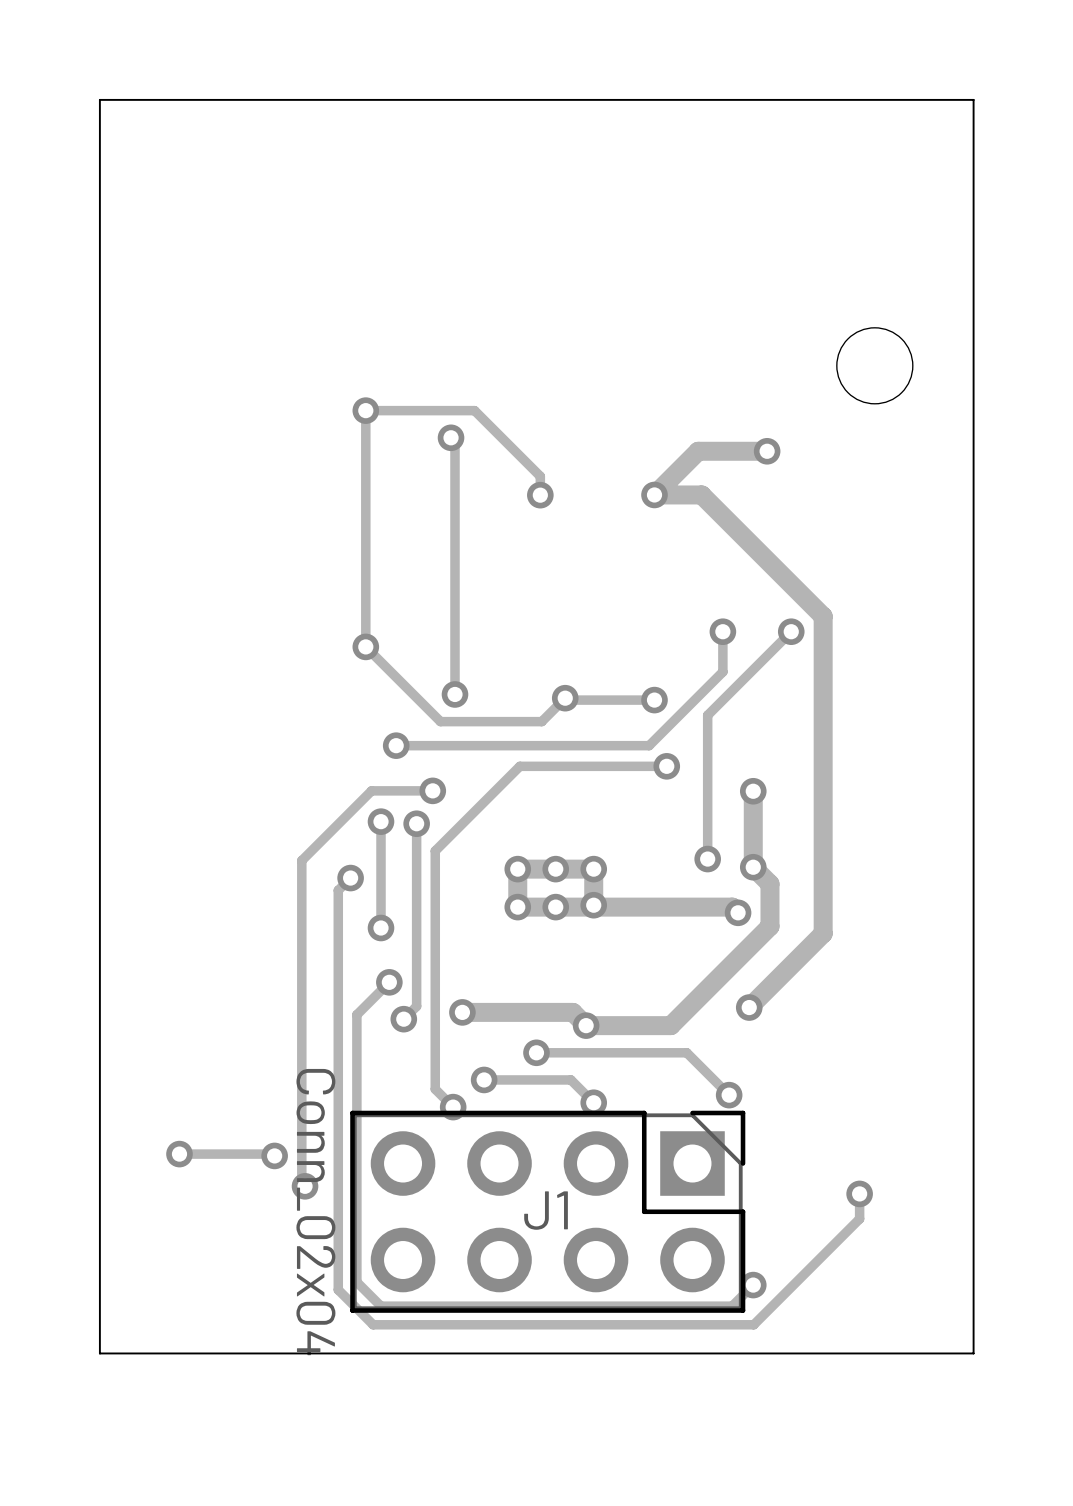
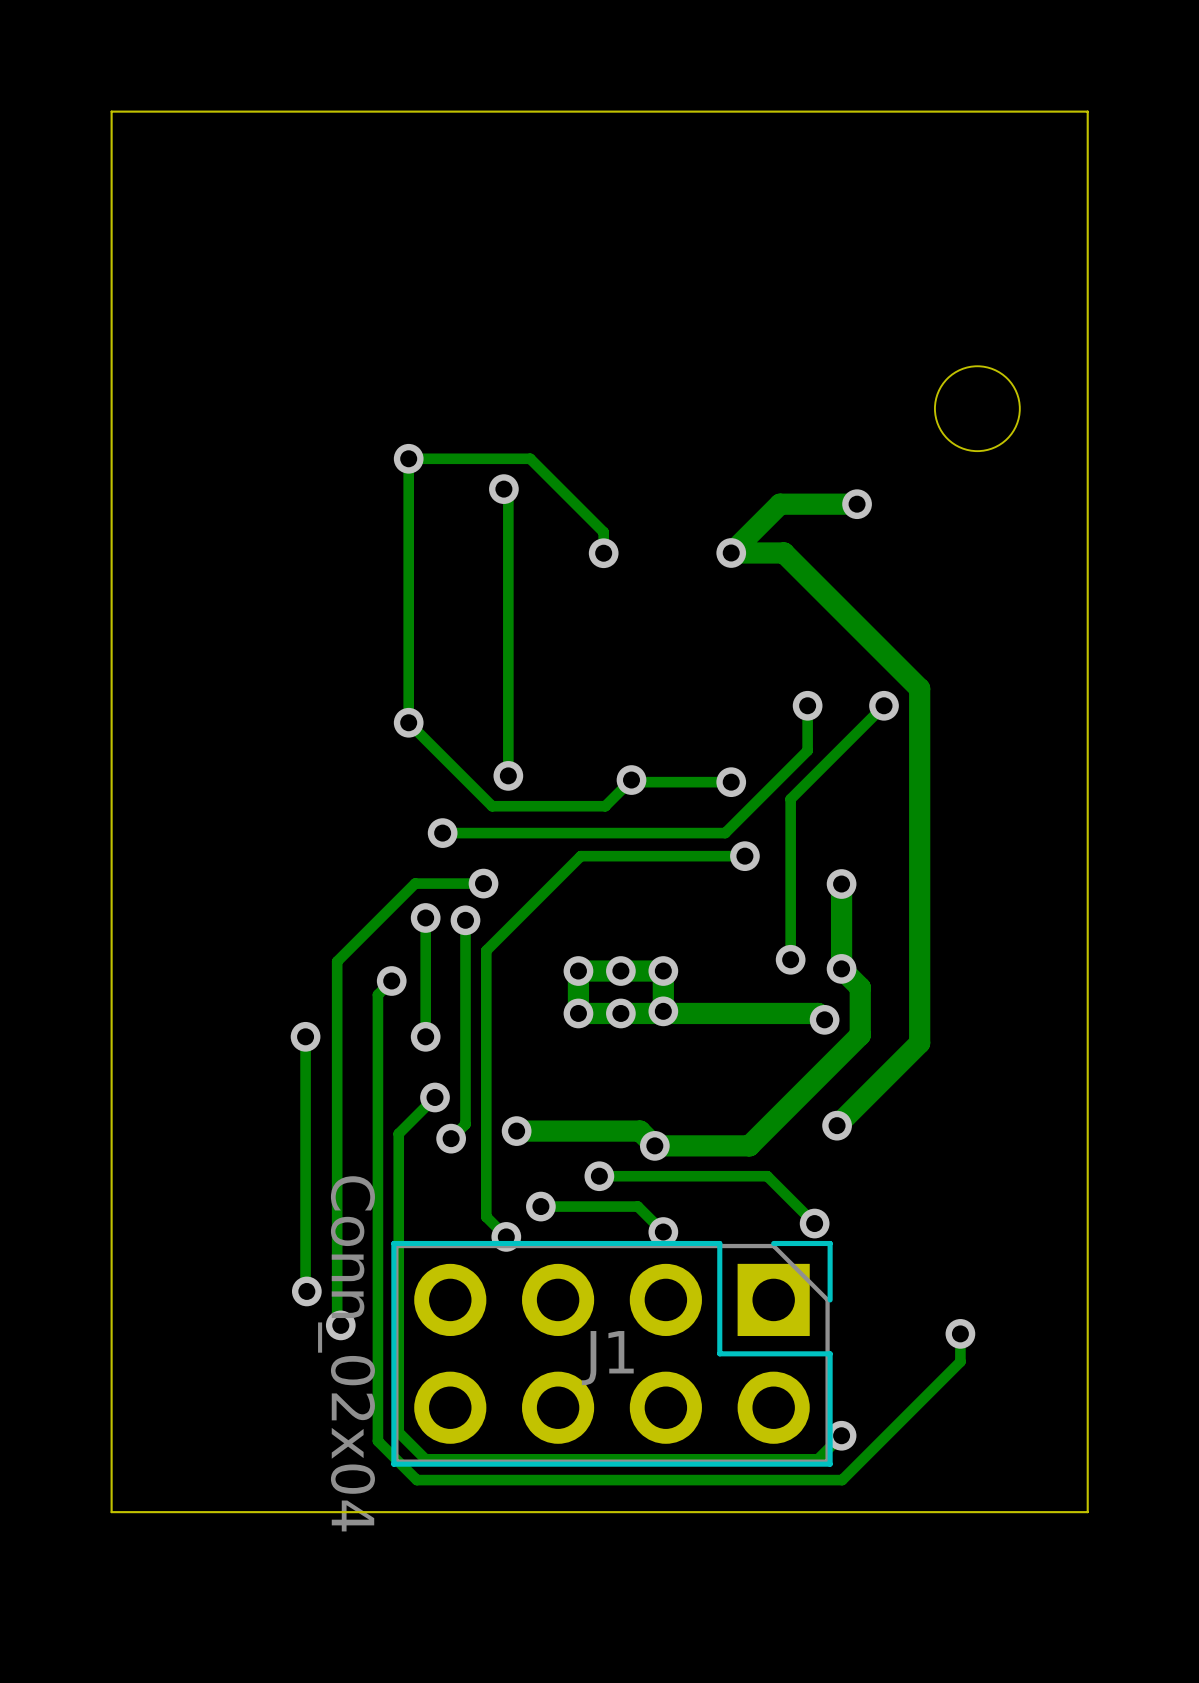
track: none -> (305, 1036) (305, 1284)
via: none -> (305, 1036)
track: (179, 1154) (273, 1154) -> none
via: (179, 1154) -> none

